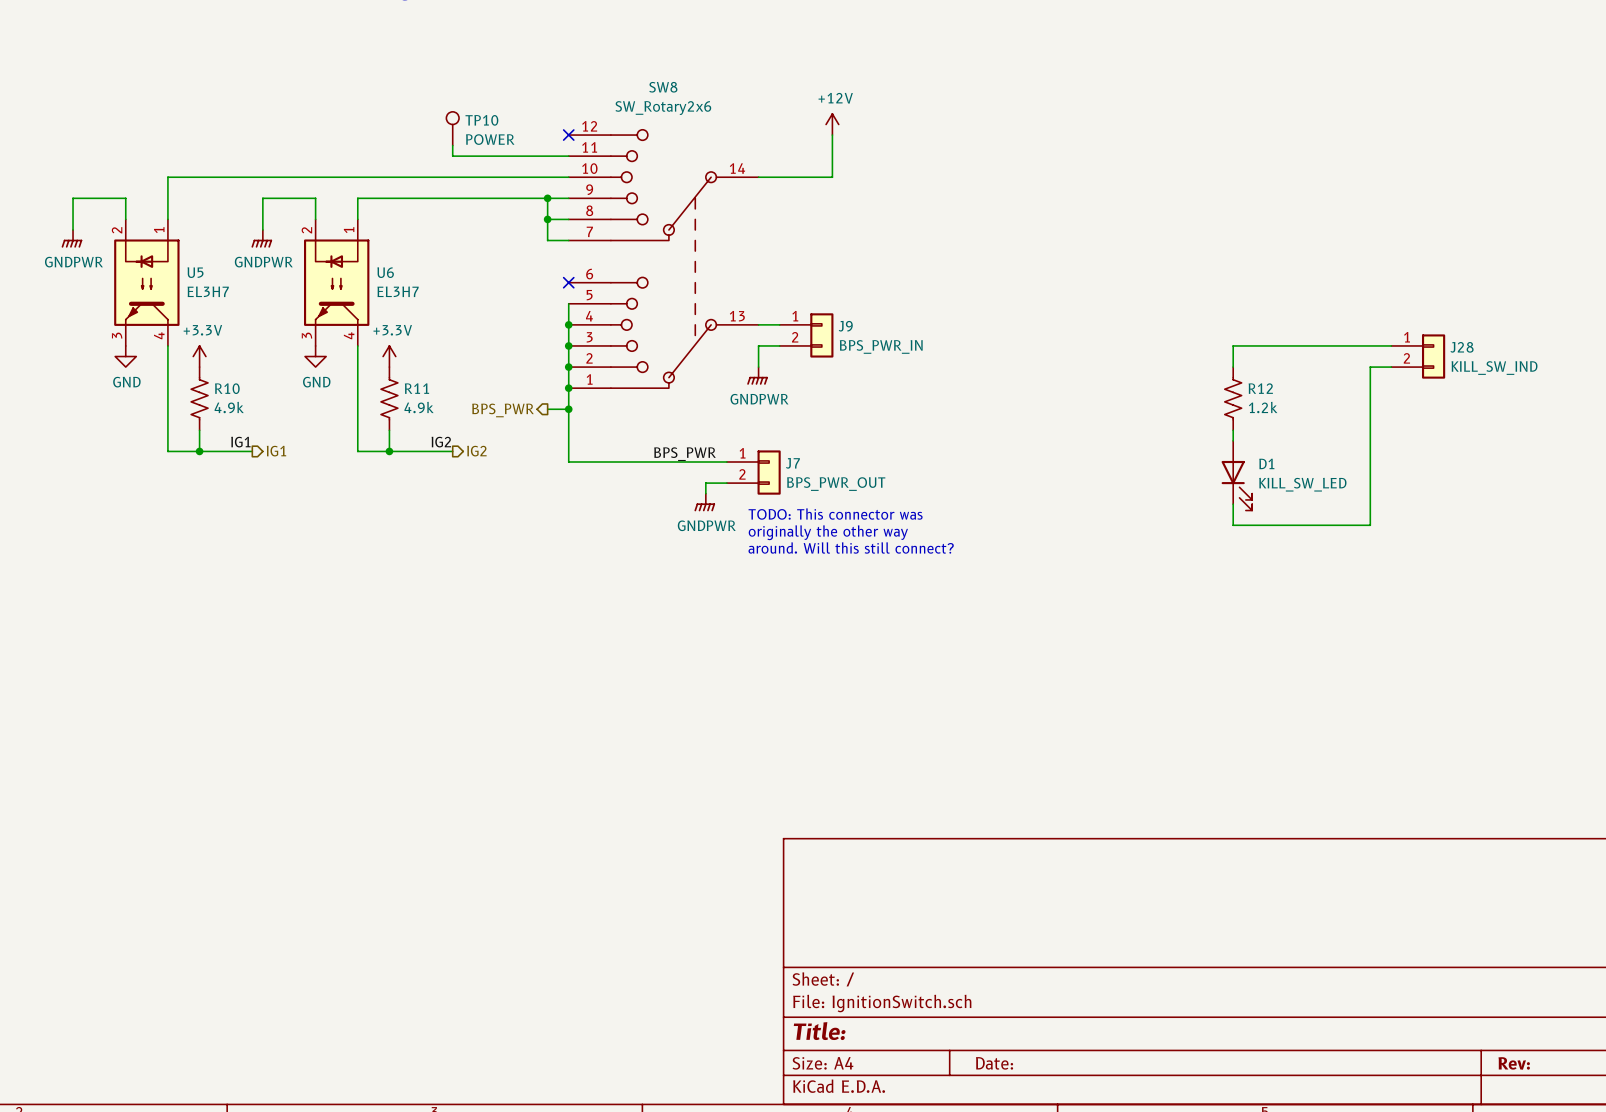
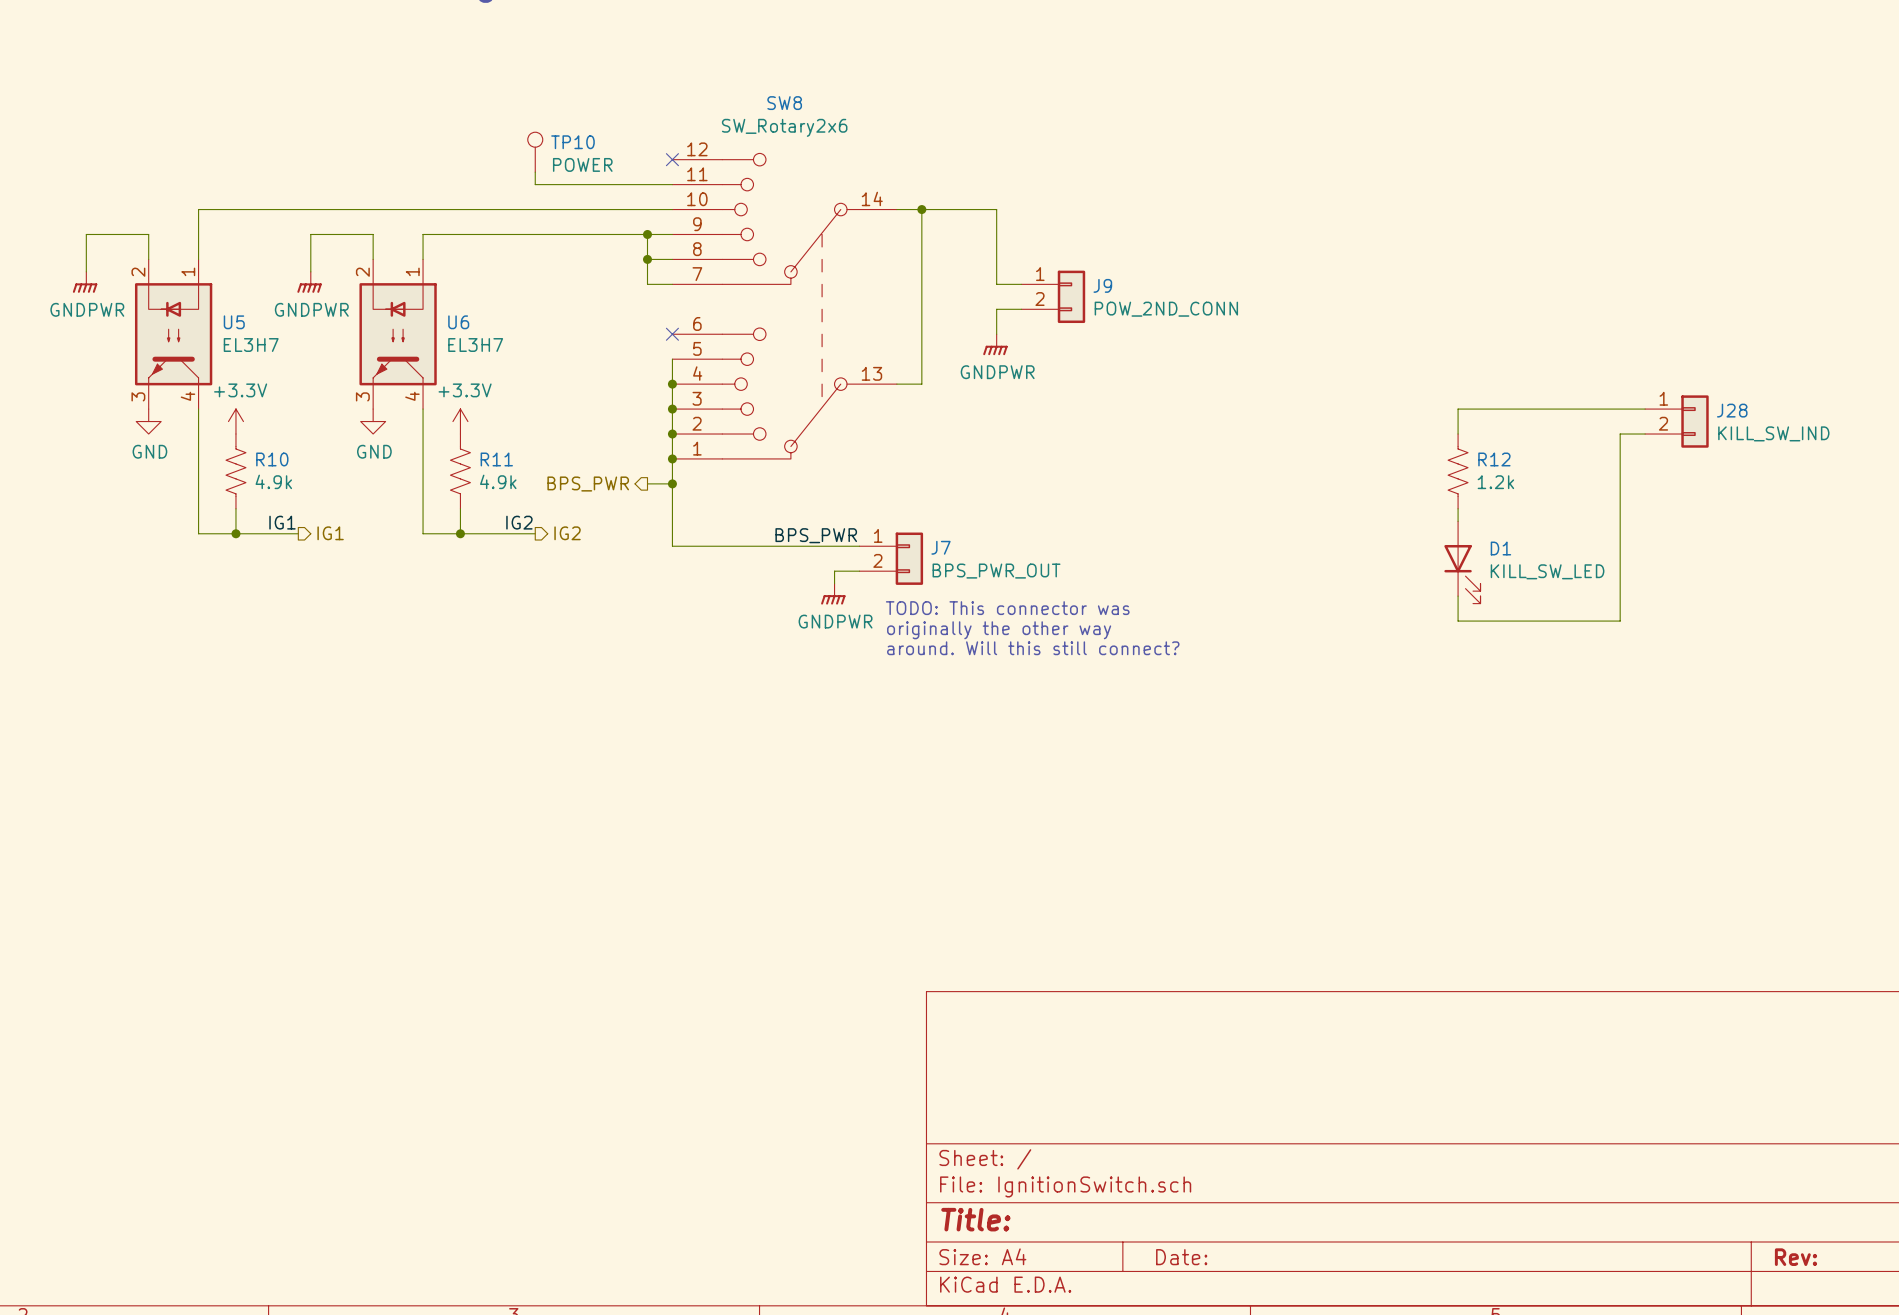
power symbol: +12V (832, 124) -> none
wire: (832, 135) (832, 177) -> (1021, 284) (996, 284) (996, 209) (984, 209)
wire: none -> (921, 209) (921, 384)
junction: none -> (921, 209)
J9 position: (806, 335) -> (1053, 296)
wire: (779, 345) (758, 345) (758, 367) -> (1021, 309) (996, 309) (996, 334)
J9 value: BPS_PWR_IN (881, 346) -> POW_2ND_CONN (1166, 309)
power symbol position: GNDPWR (757, 375) -> GNDPWR (995, 344)

